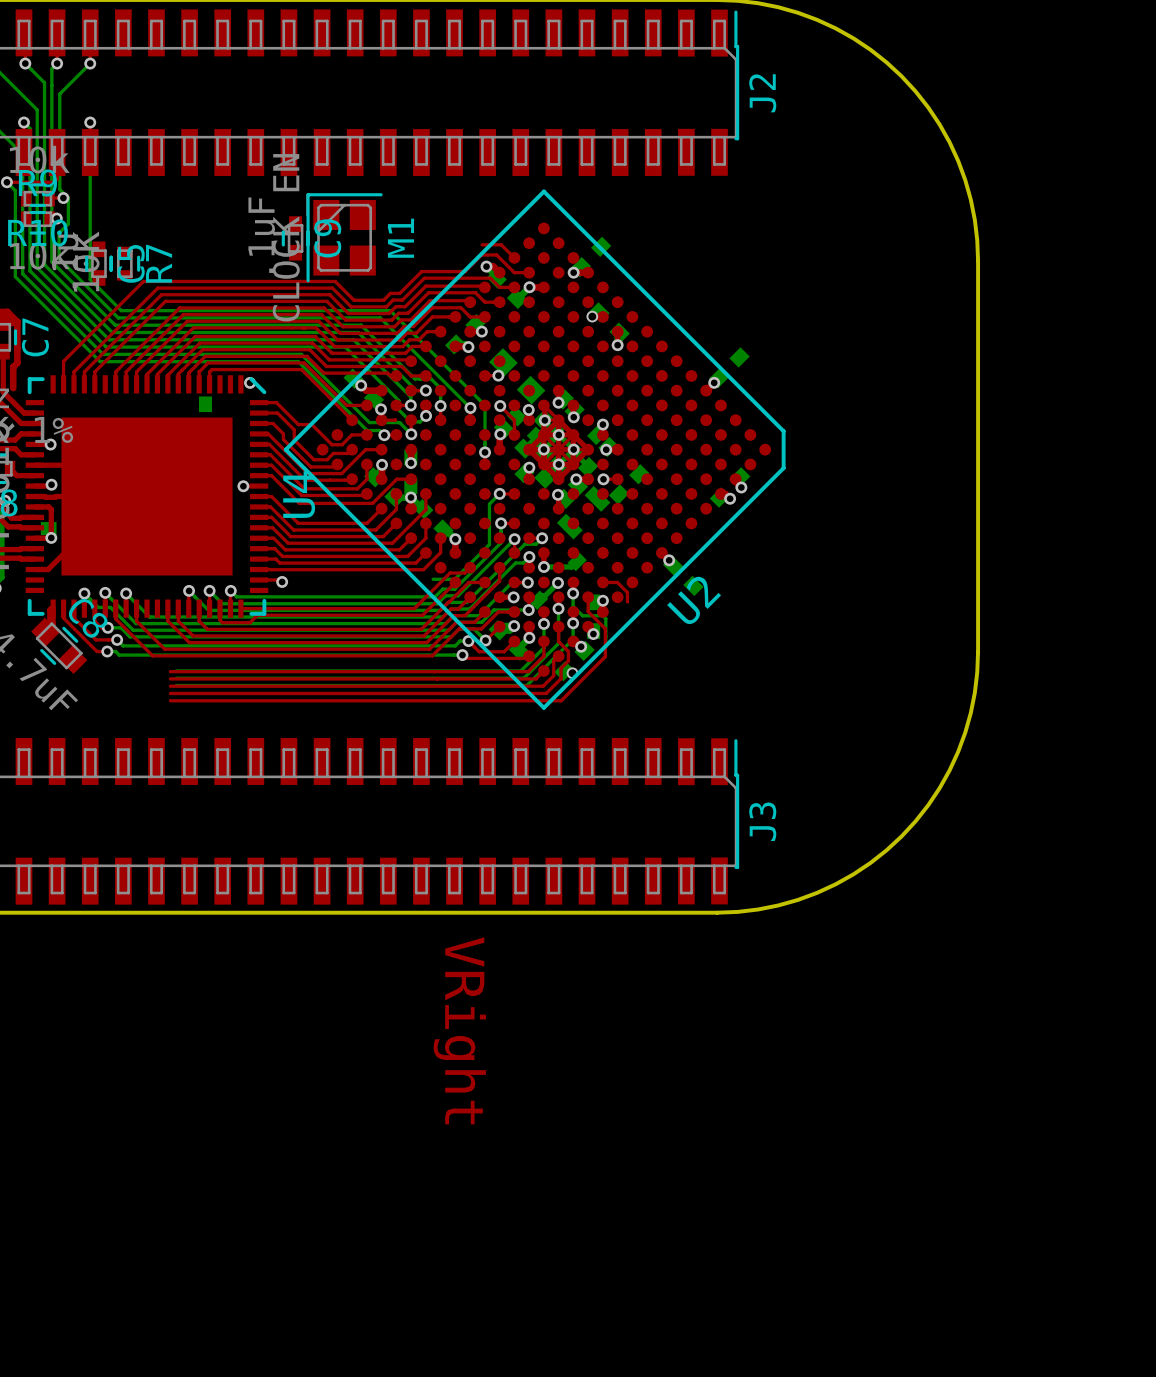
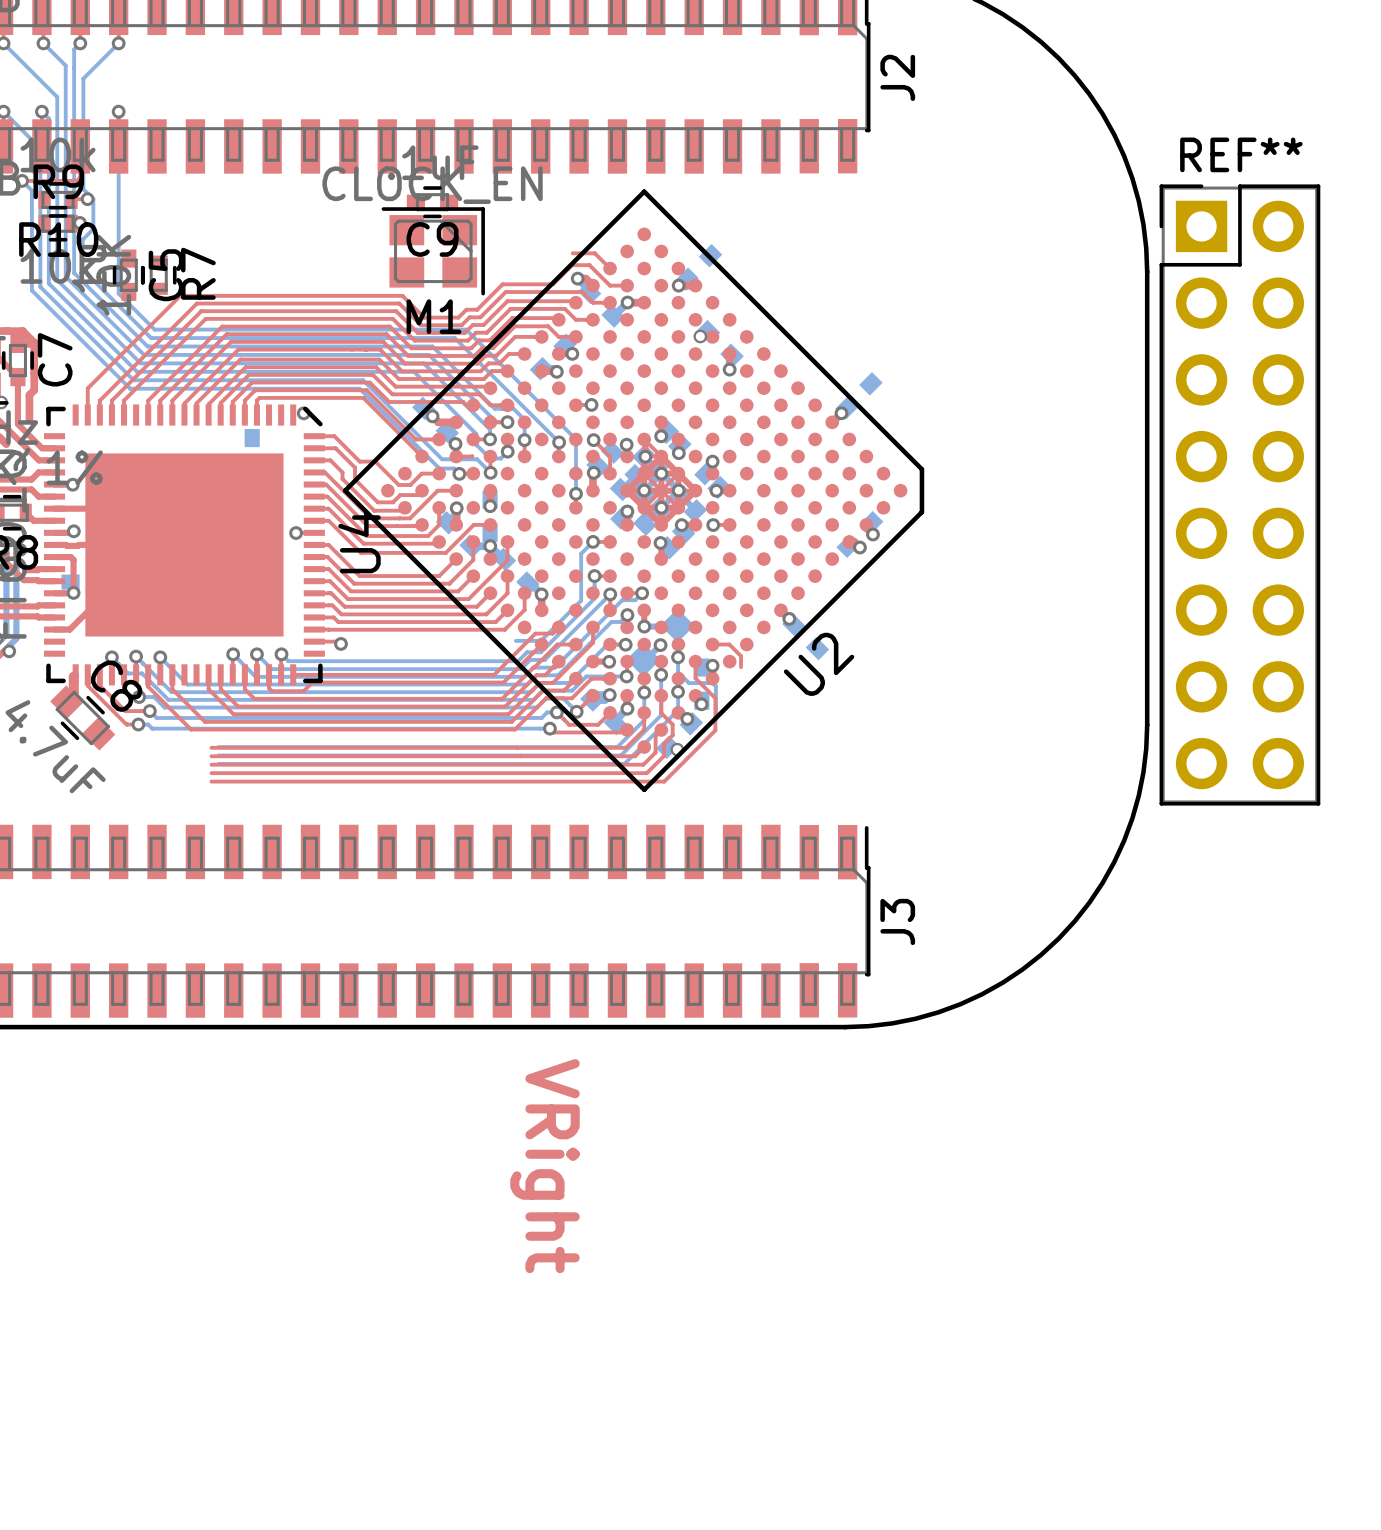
M1 rotation: 0° (344, 237) -> 90° clockwise (433, 251)
C9 rotation: 0° (295, 238) -> 90° clockwise (432, 202)
C9 position: (295, 238) -> (432, 202)
part: (517, 376) -> none
REF**: none -> (1239, 494)
part: (629, 484) -> none
part: (583, 512) -> none
part footprint: [528, 551, 587, 610] -> [626, 608, 695, 677]

